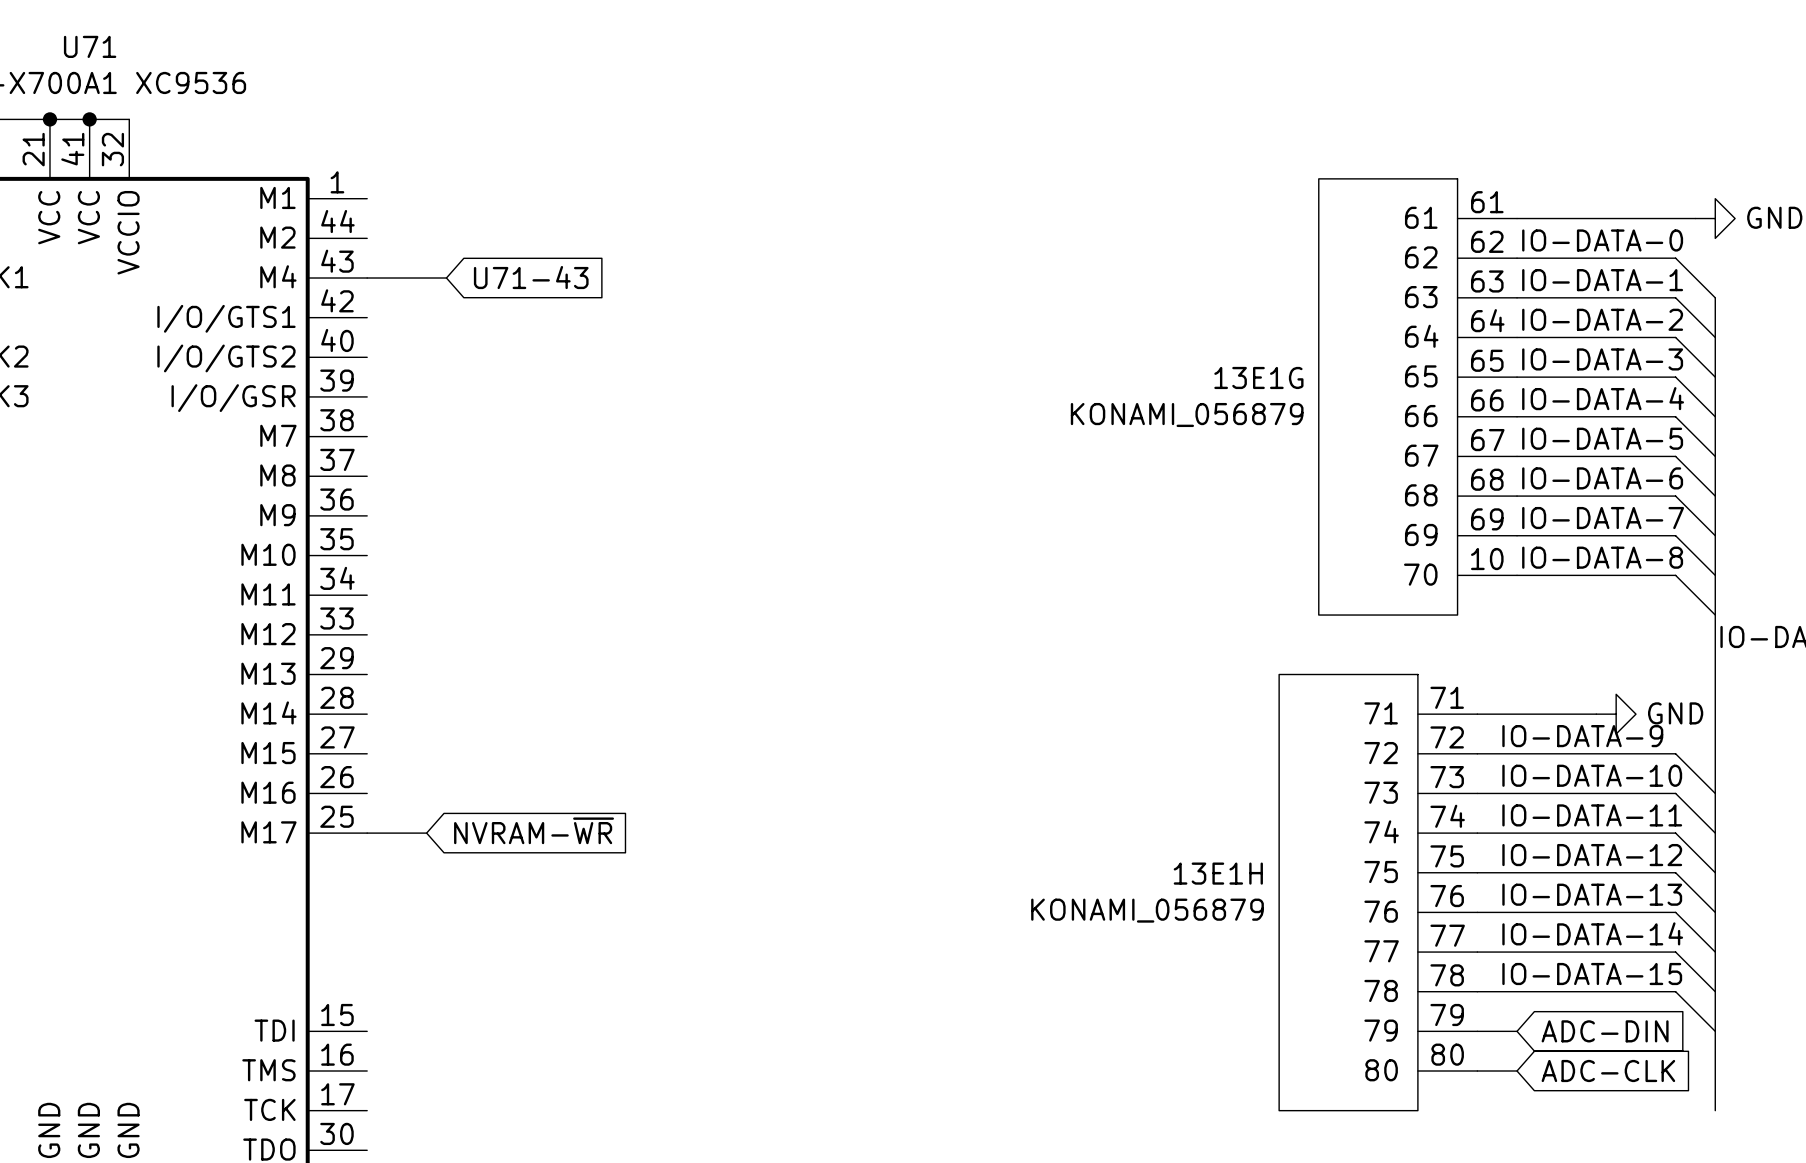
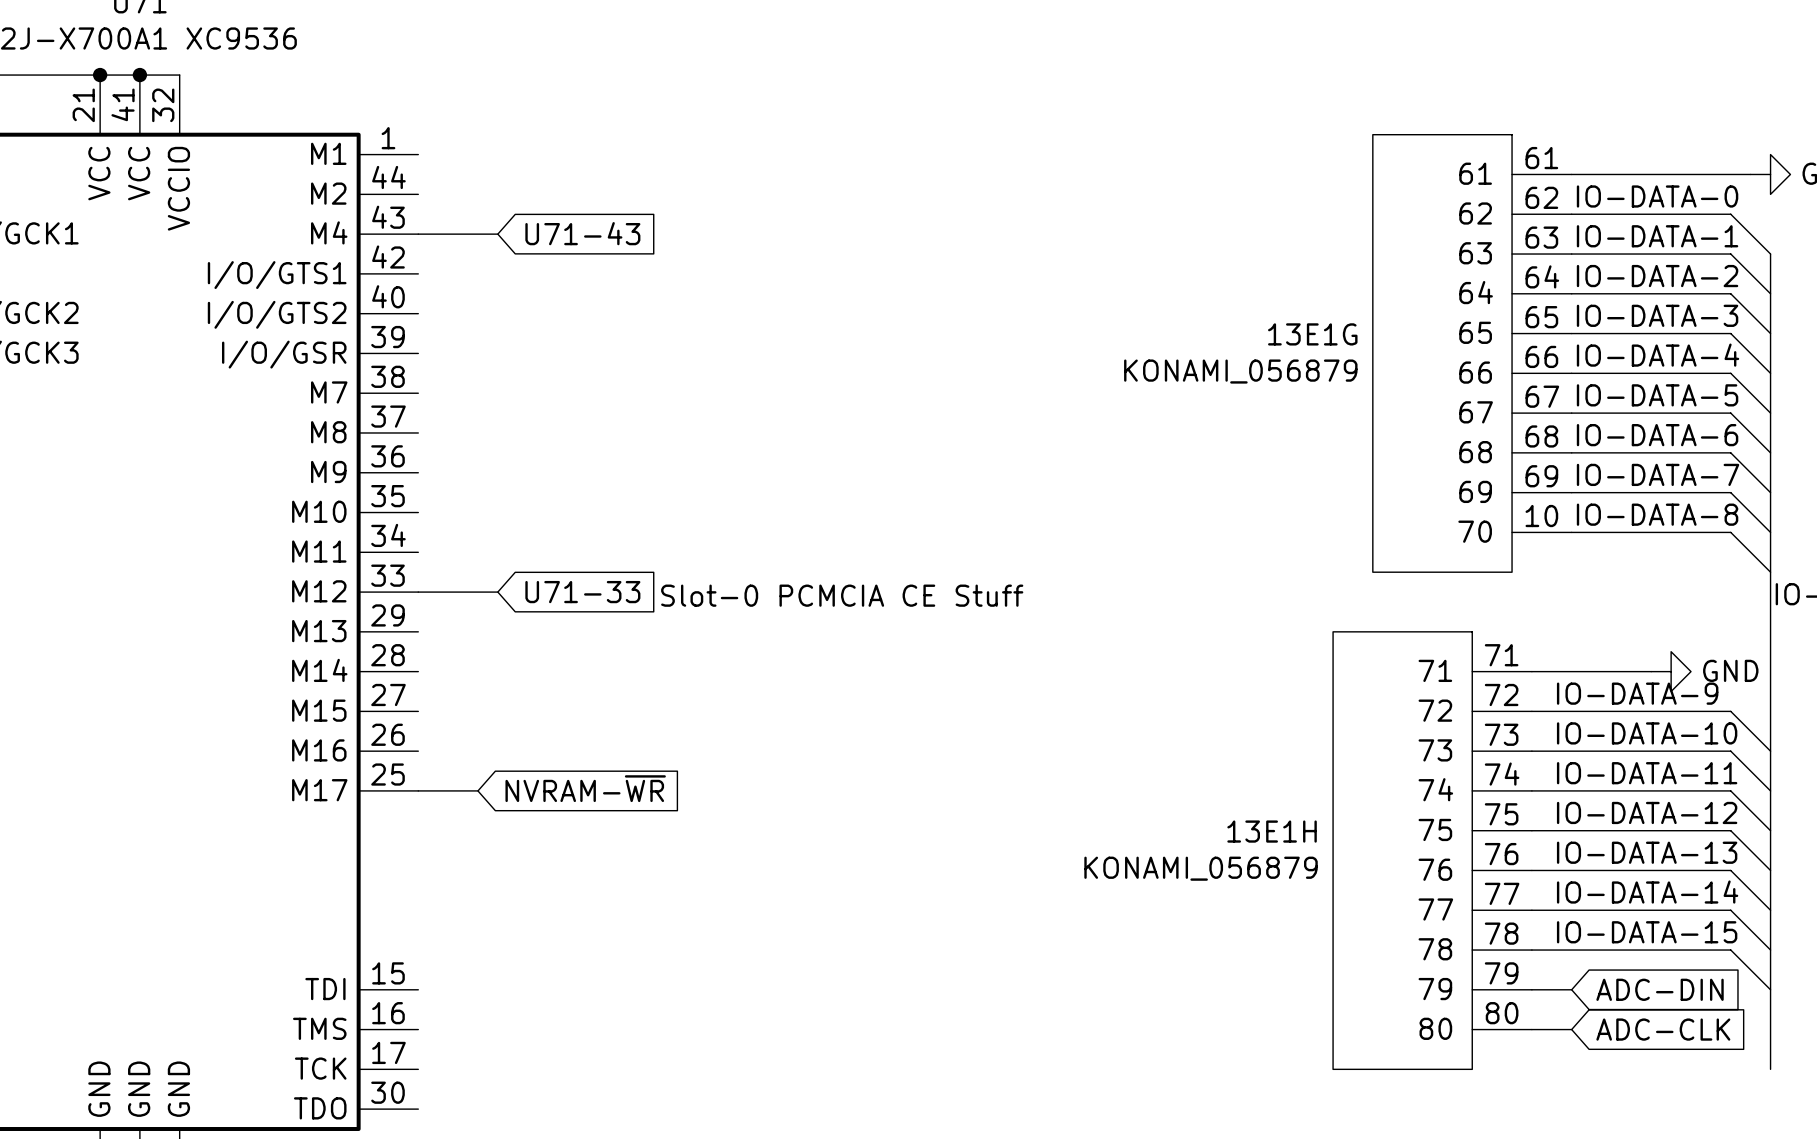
wire: none -> (418, 592) (497, 592)
global label: none -> U71-33 (582, 592)
text: none -> Slot-0 PCMCIA CE Stuff (842, 595)

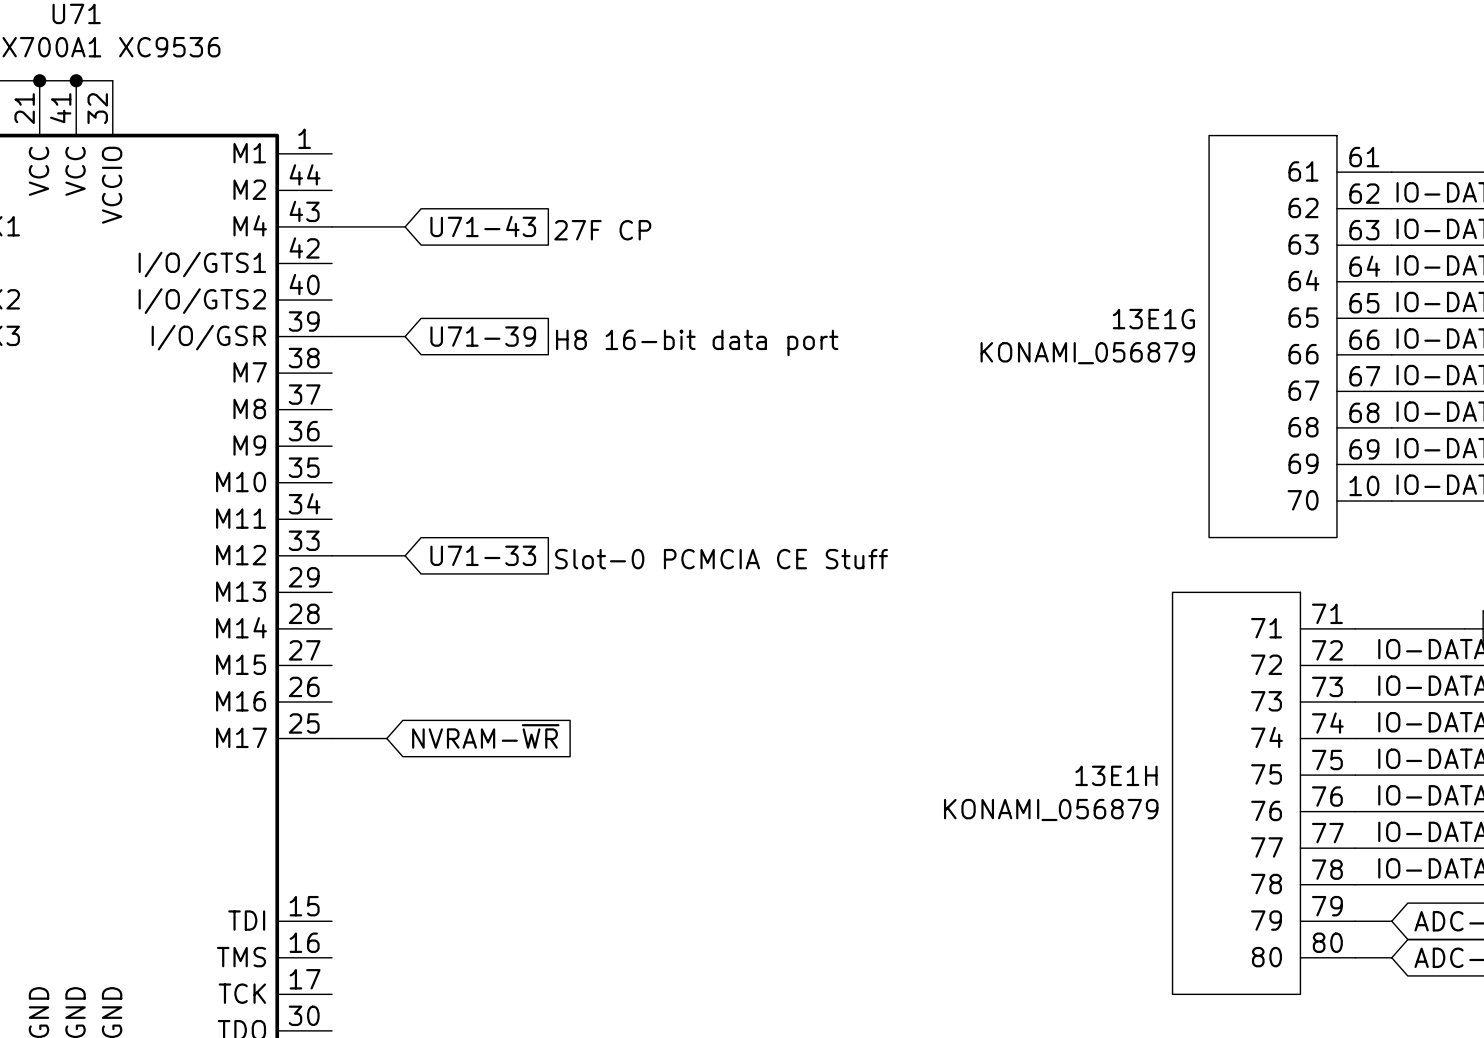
text: none -> 27F CP (602, 230)
wire: none -> (332, 336) (405, 336)
global label: none -> U71-39 (483, 336)
text: none -> H8 16-bit data port (697, 342)

